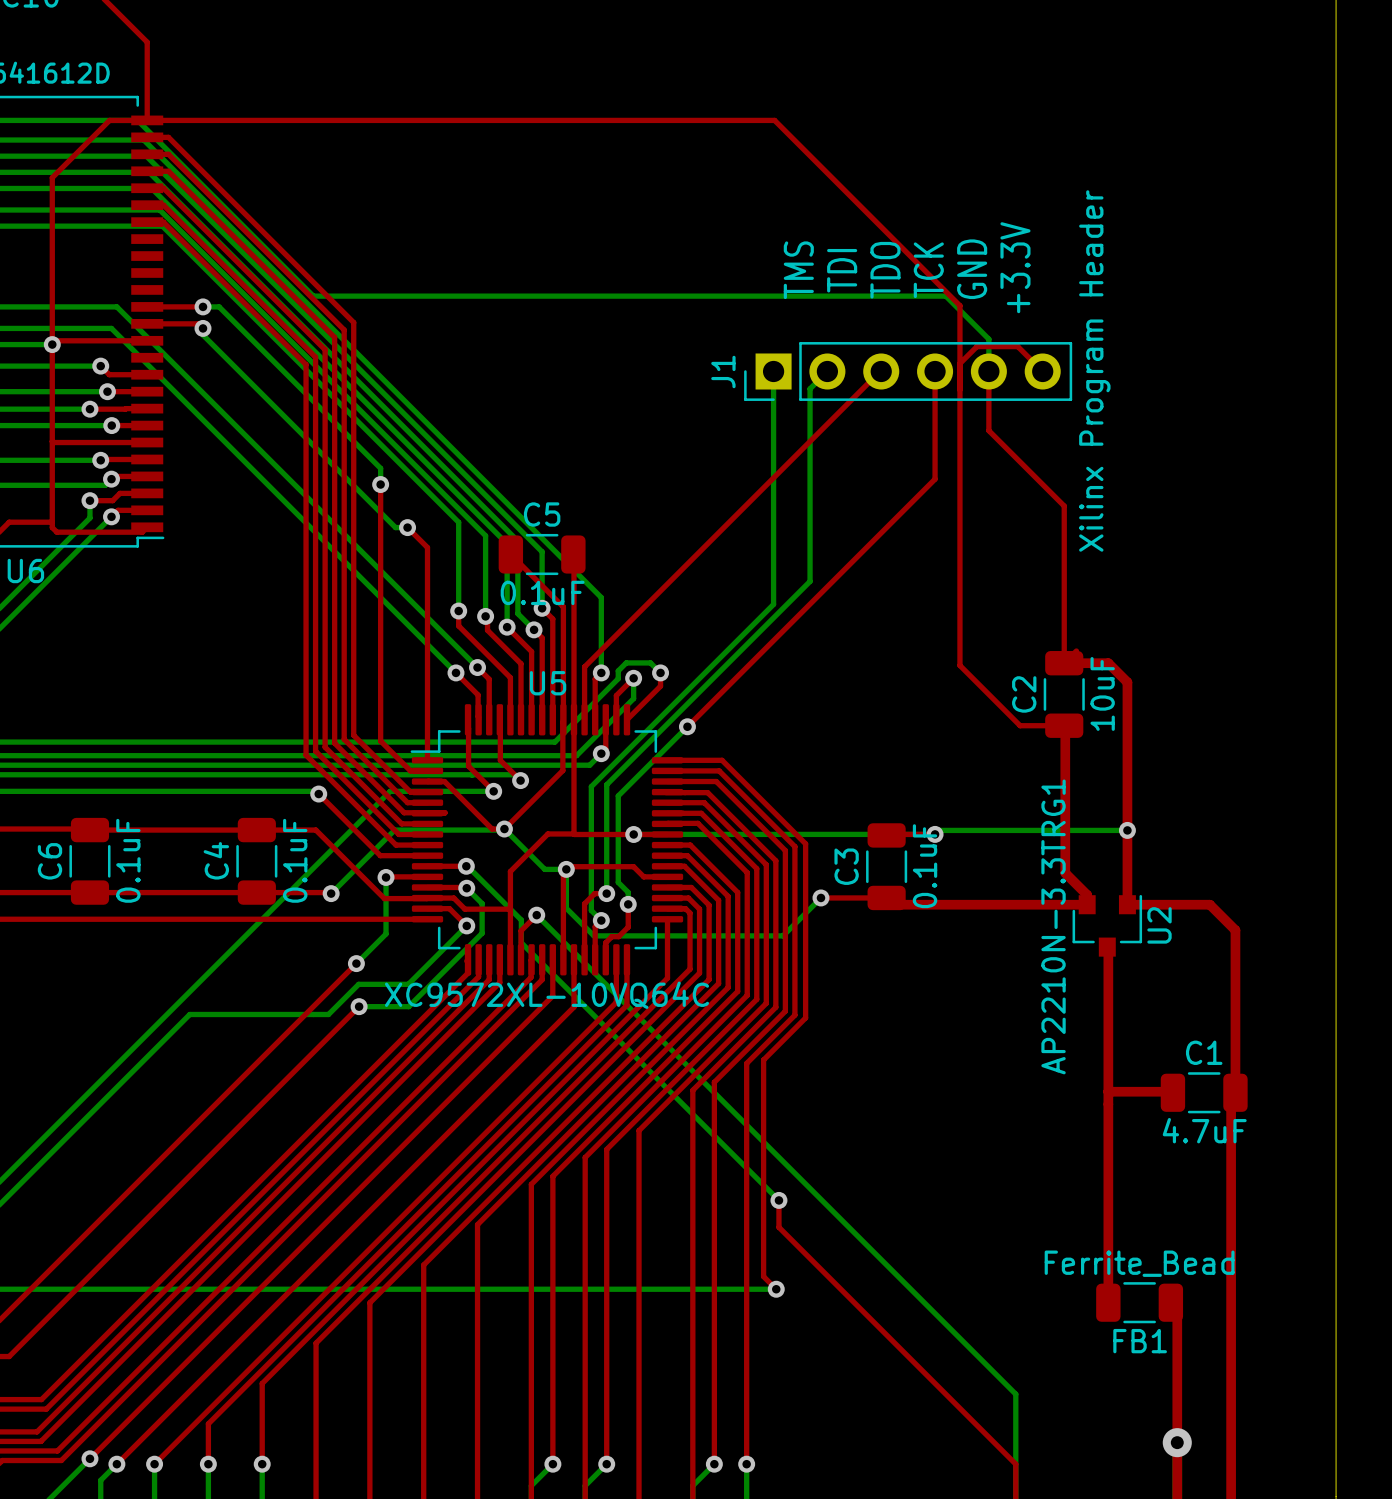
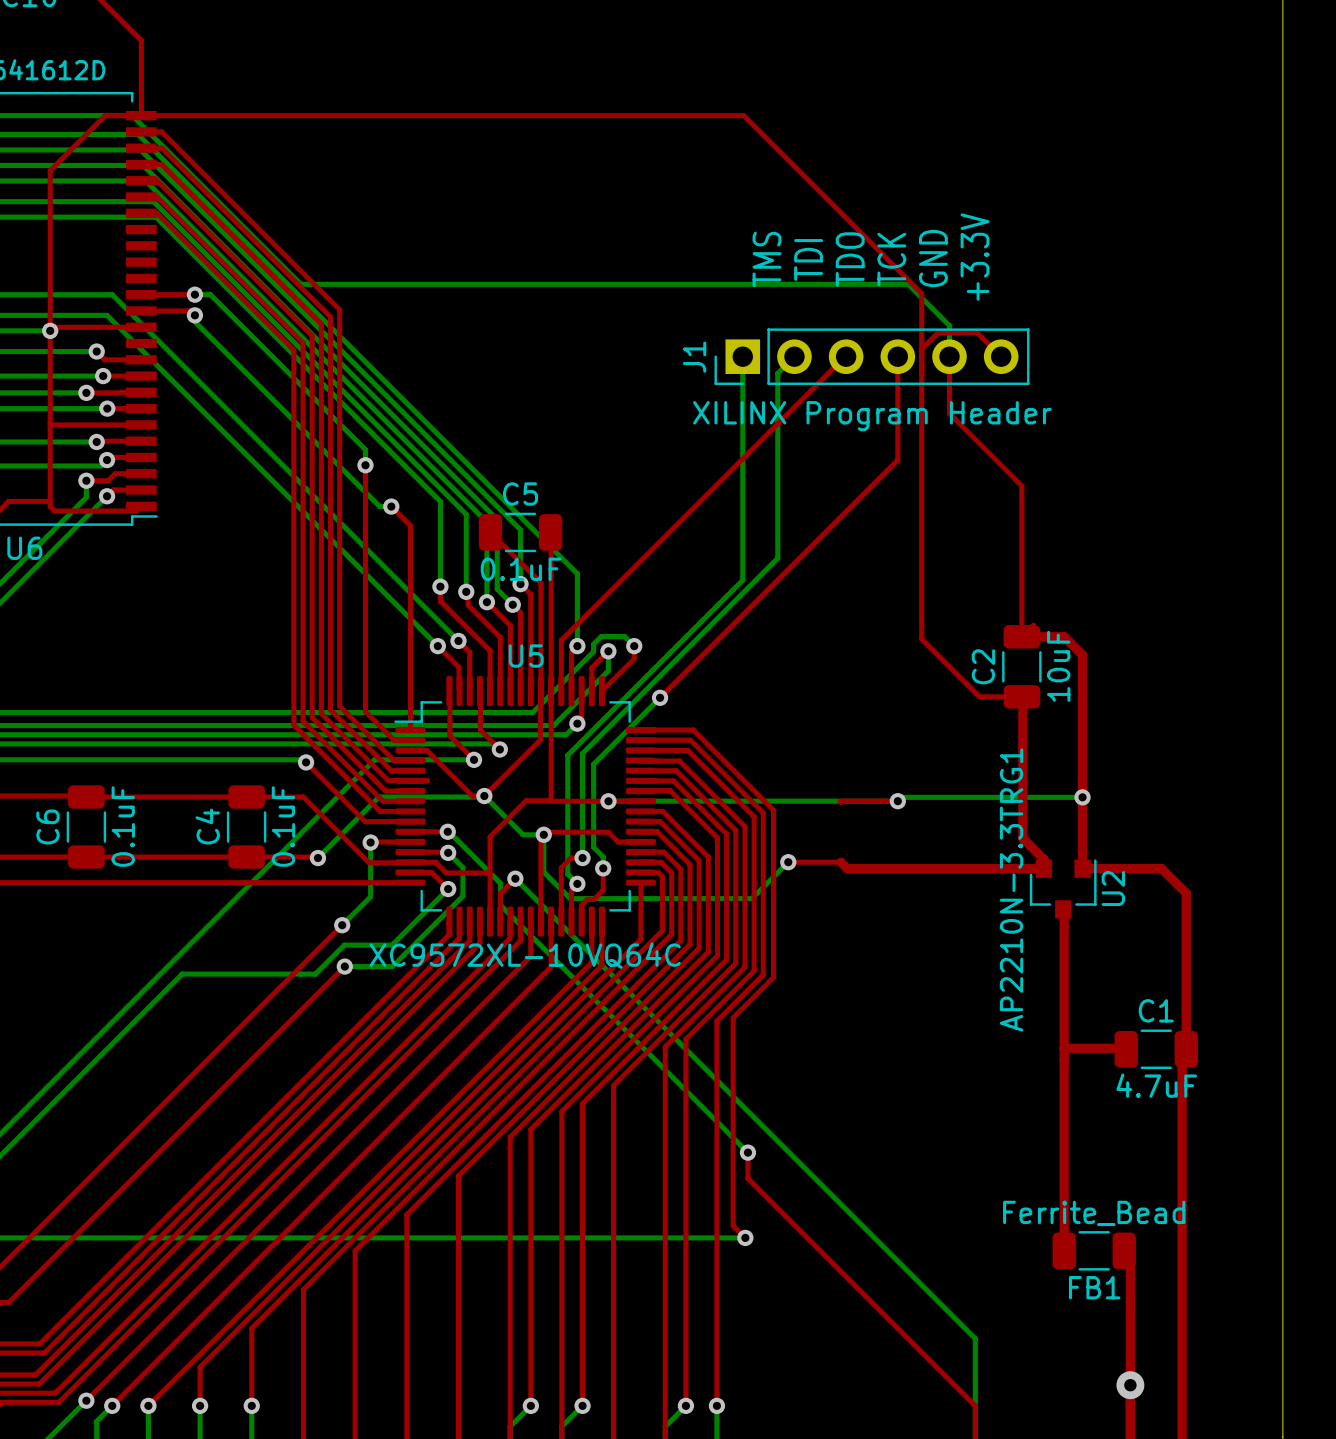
J1 value: Xilinx Program Header (1094, 370) -> none
text: none -> XILINX Program Header (872, 416)
C3: 0.1uF (886, 866) -> none

